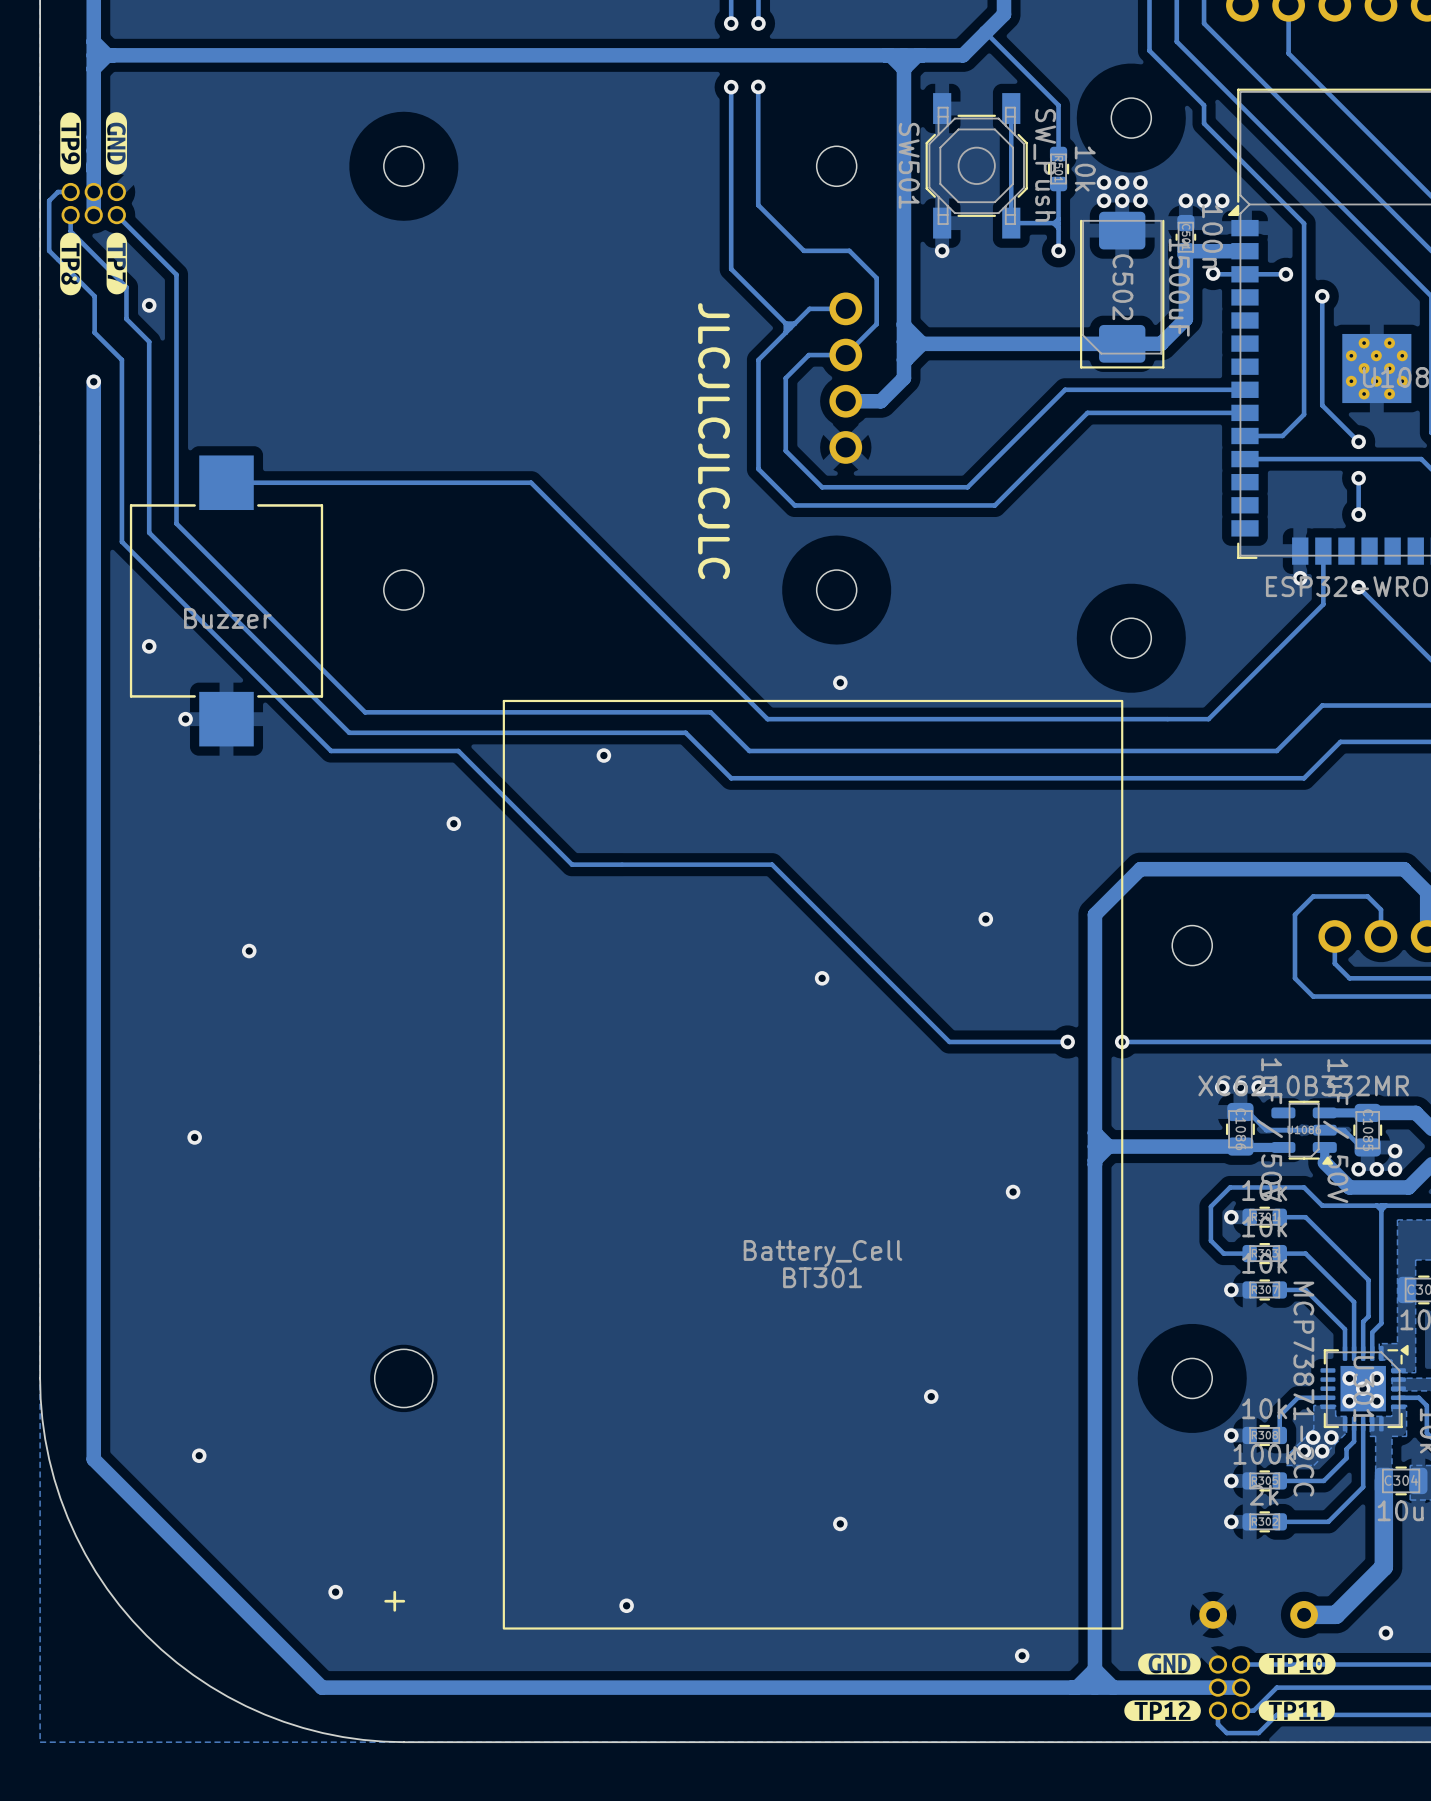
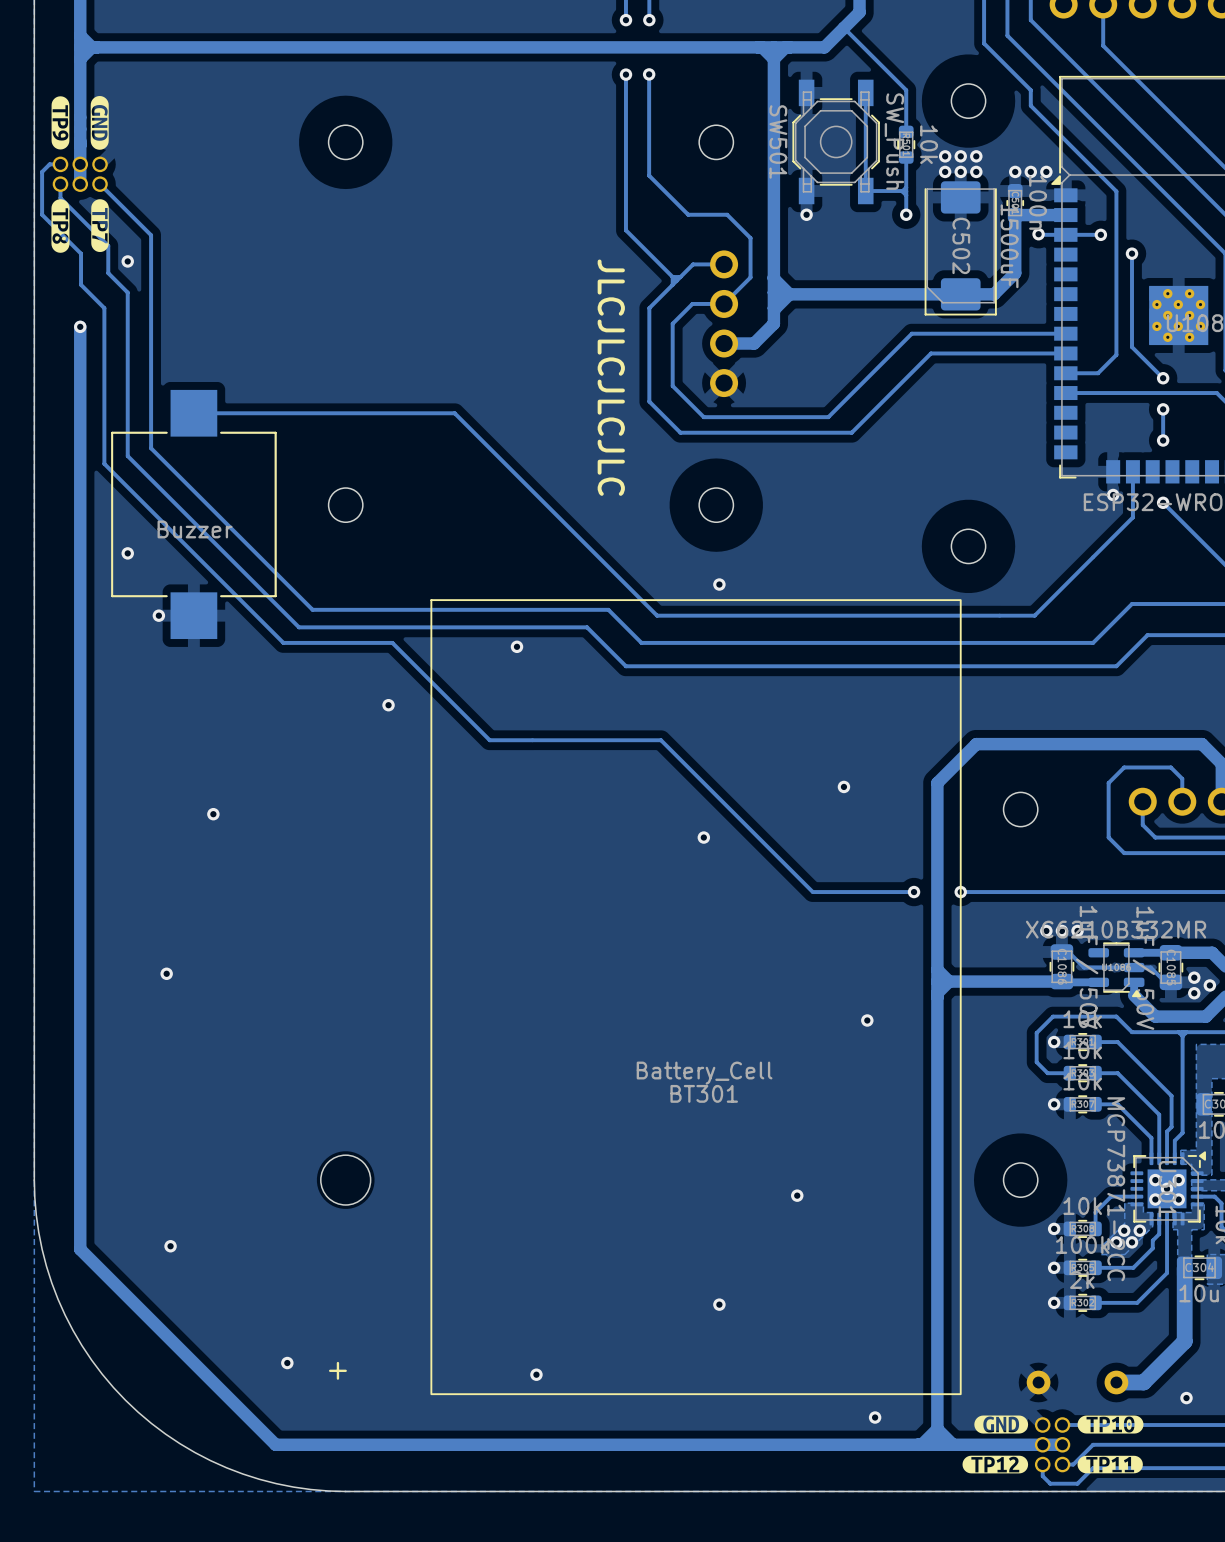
via: none -> (1194, 977)
via: (1395, 1151) -> none
via: none -> (1209, 985)
via: none -> (1194, 993)
via: (1358, 1169) -> none
via: (1376, 1169) -> none
via: (1395, 1169) -> none

